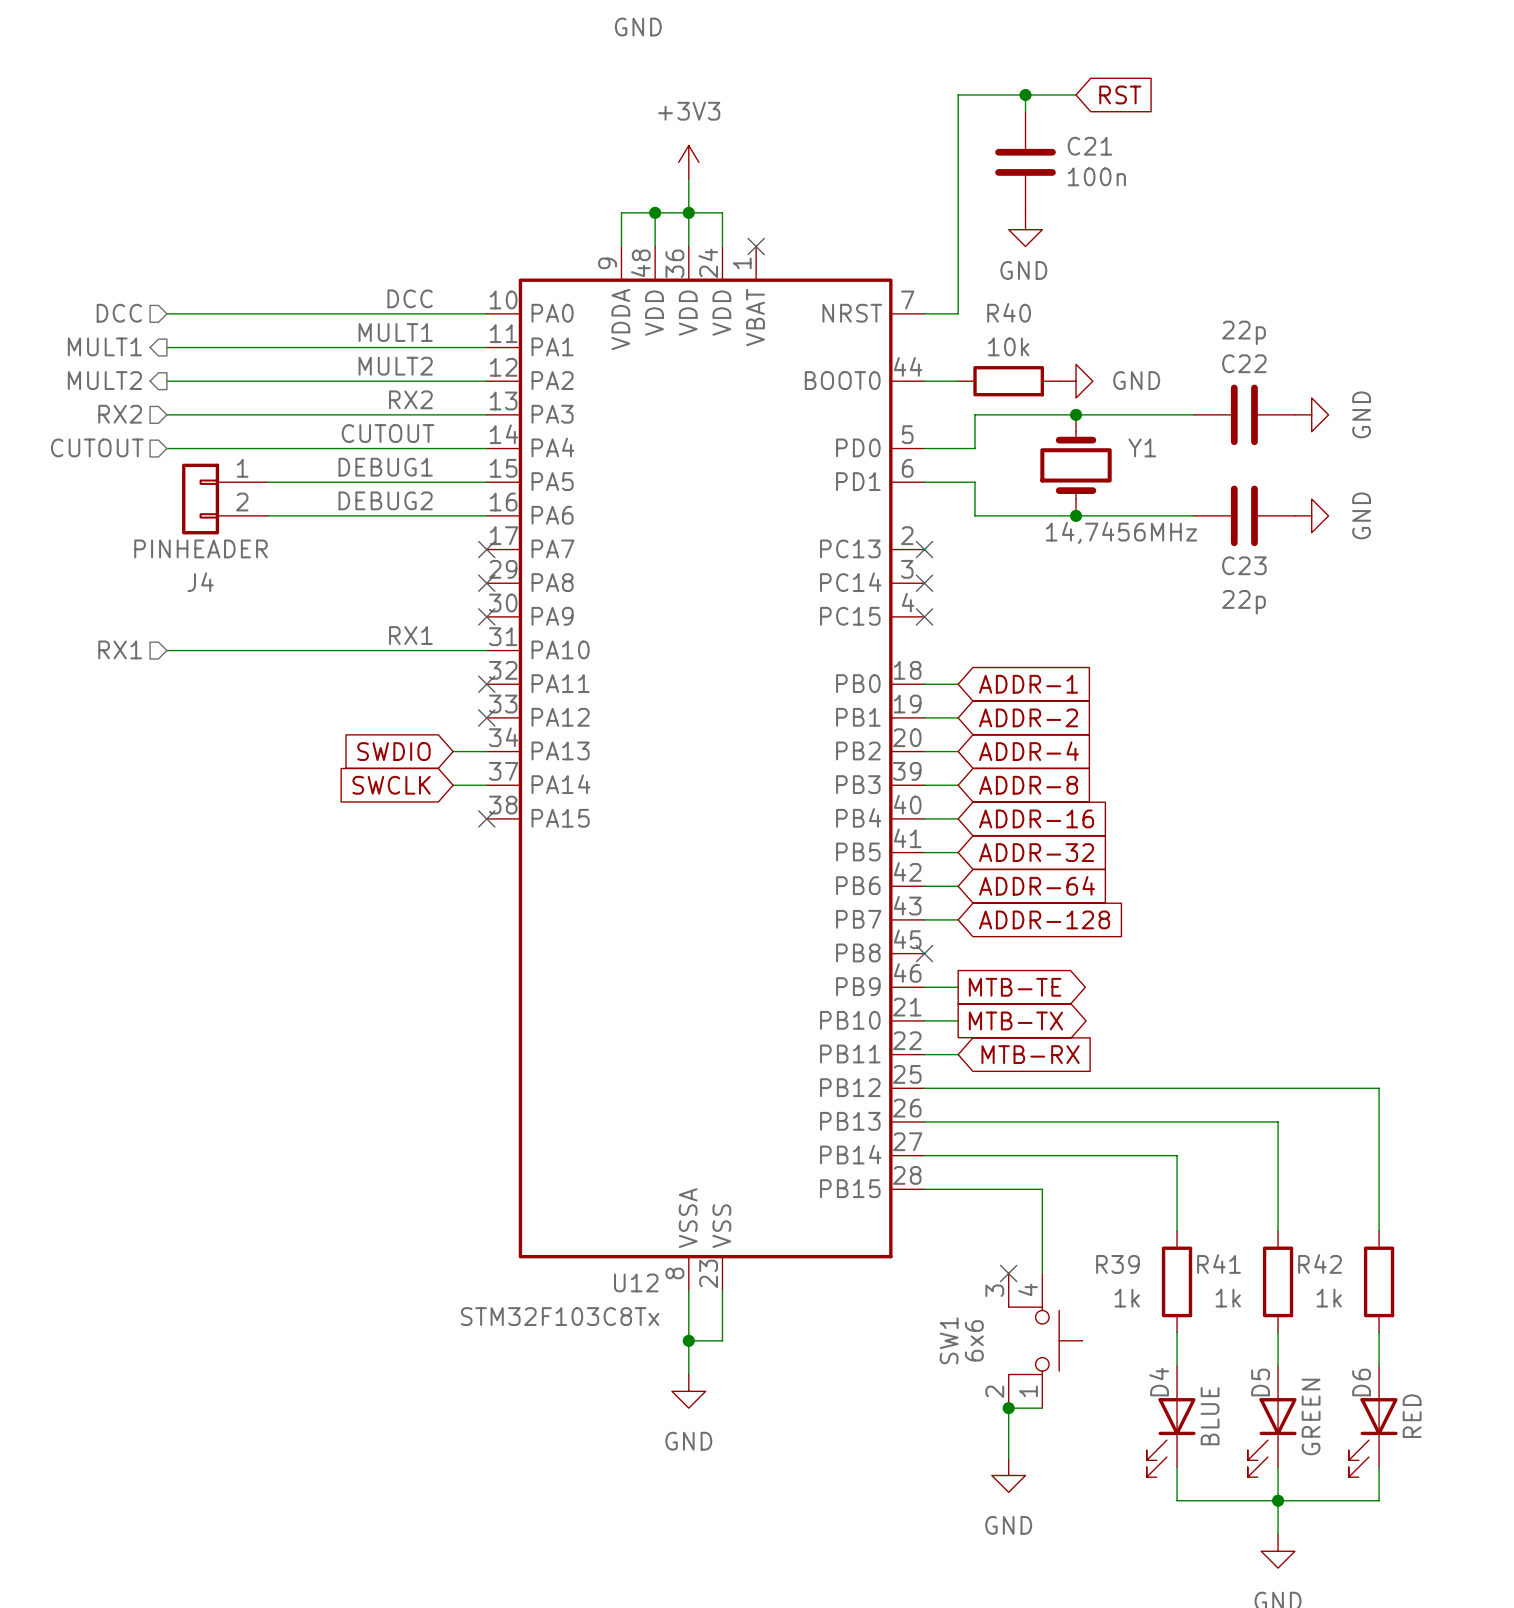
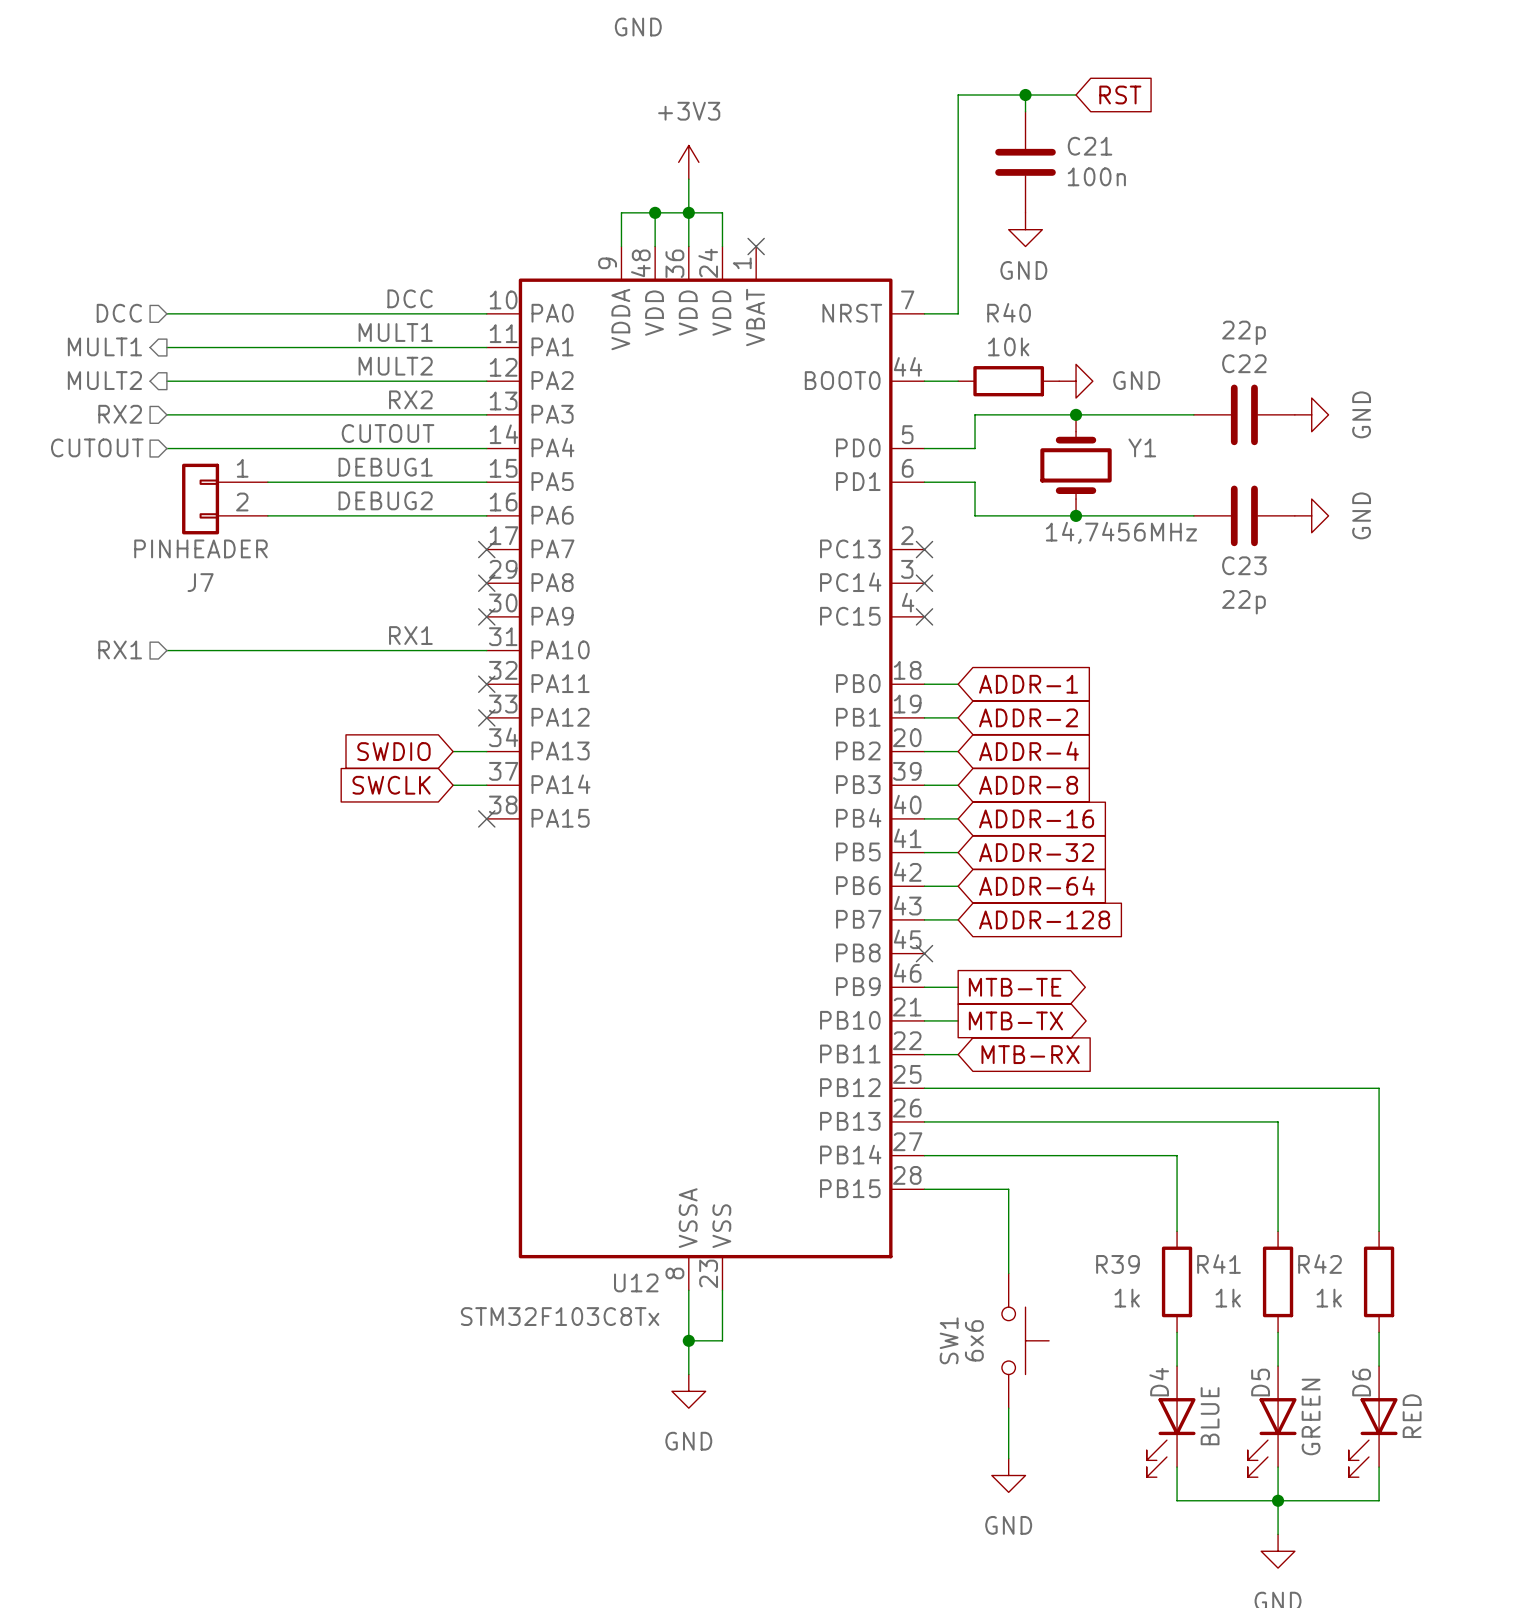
J4 name: J4 (200, 582) -> J7 (200, 582)
wire: (1008, 1189) (1042, 1189) (1042, 1273) -> (1008, 1189) (1008, 1273)
no-connect mark: (1008, 1273) -> none
SW1 symbol: [1008, 1273, 1083, 1409] -> [1001, 1273, 1050, 1409]
wire: (1008, 1408) (1042, 1408) -> none
junction: (1008, 1408) -> none

